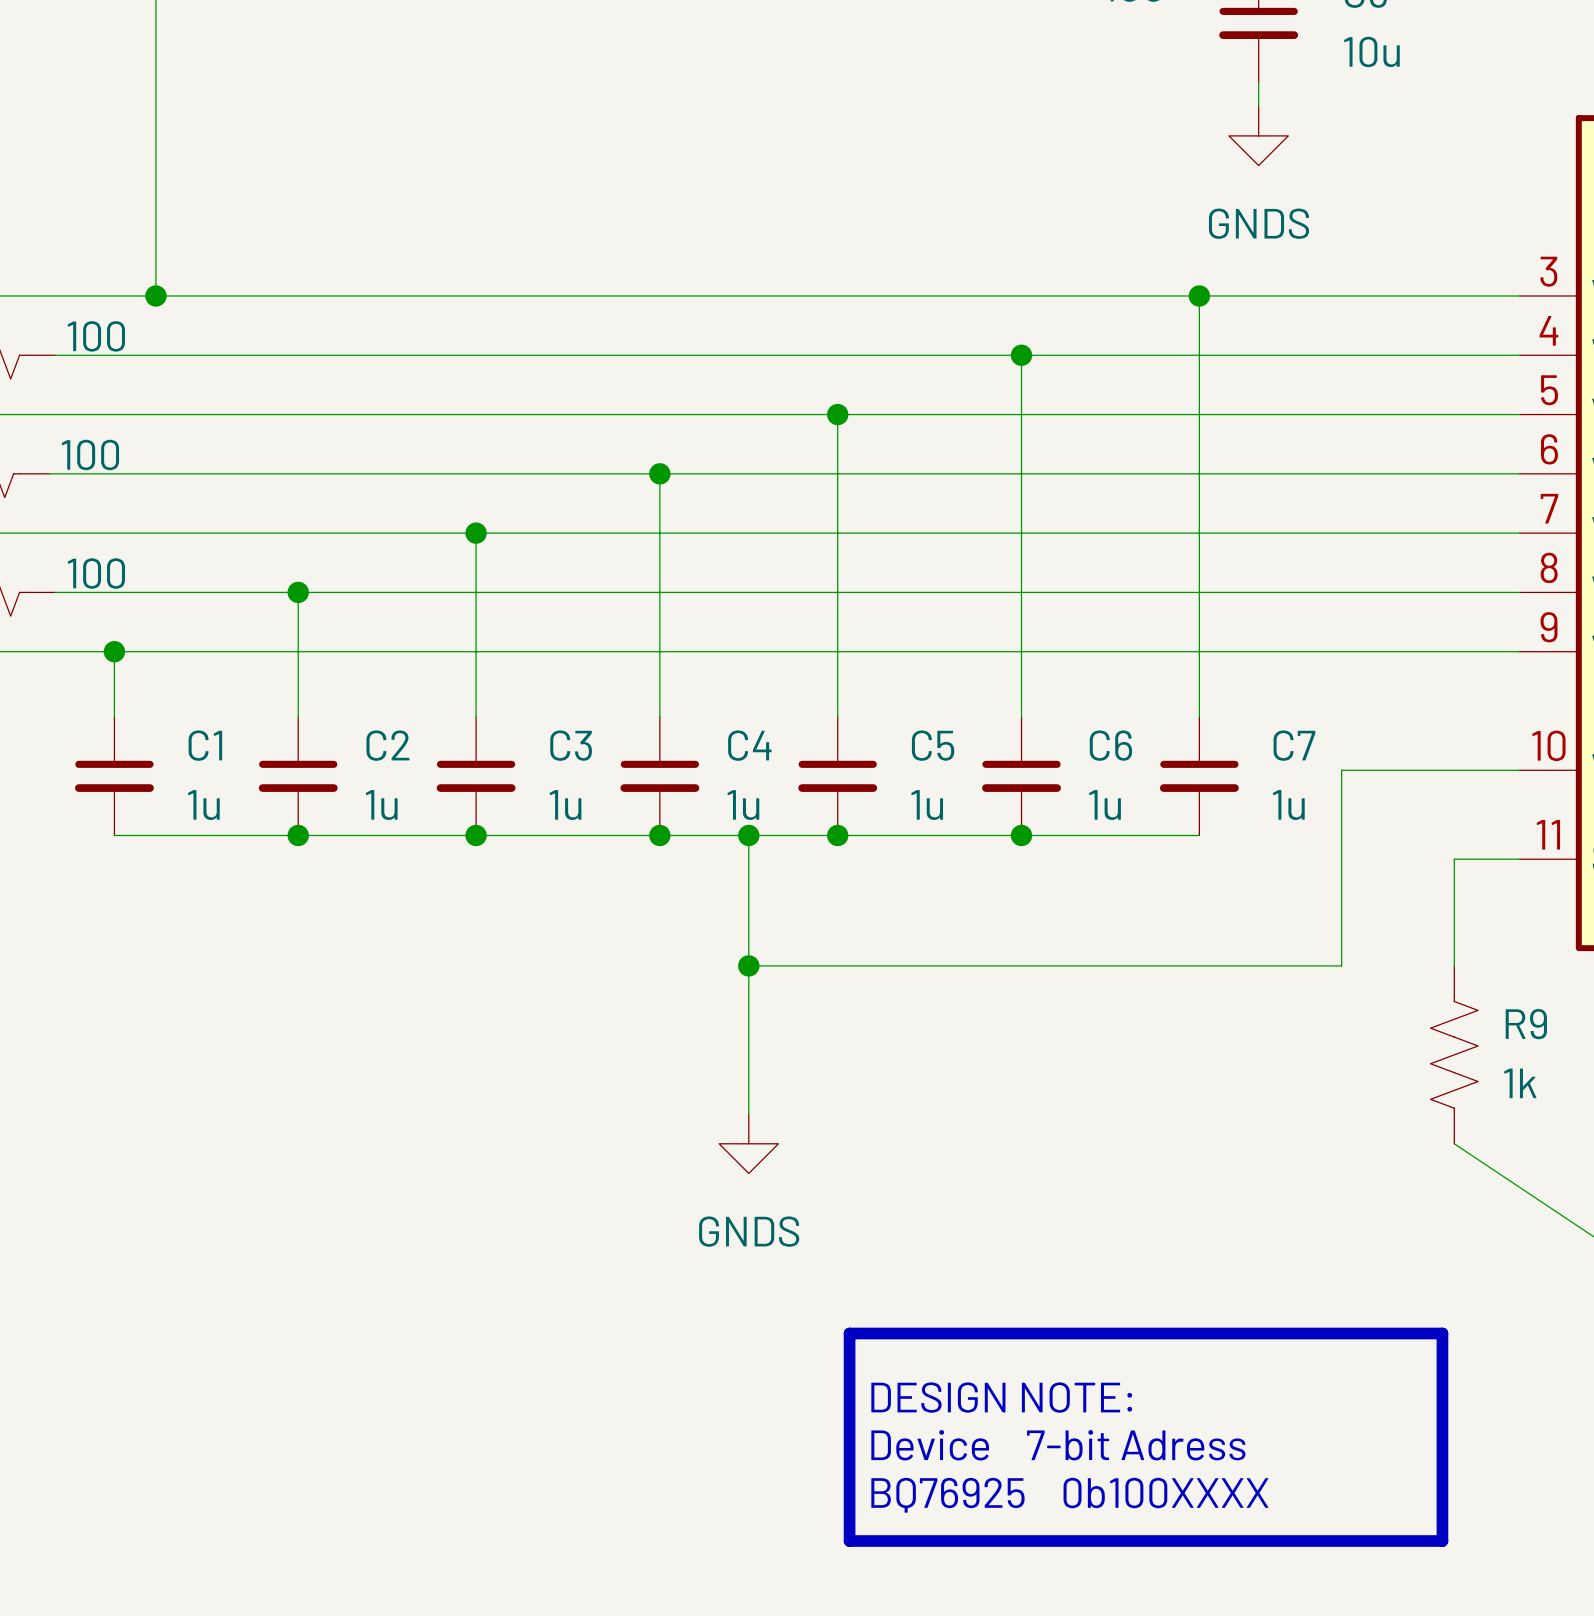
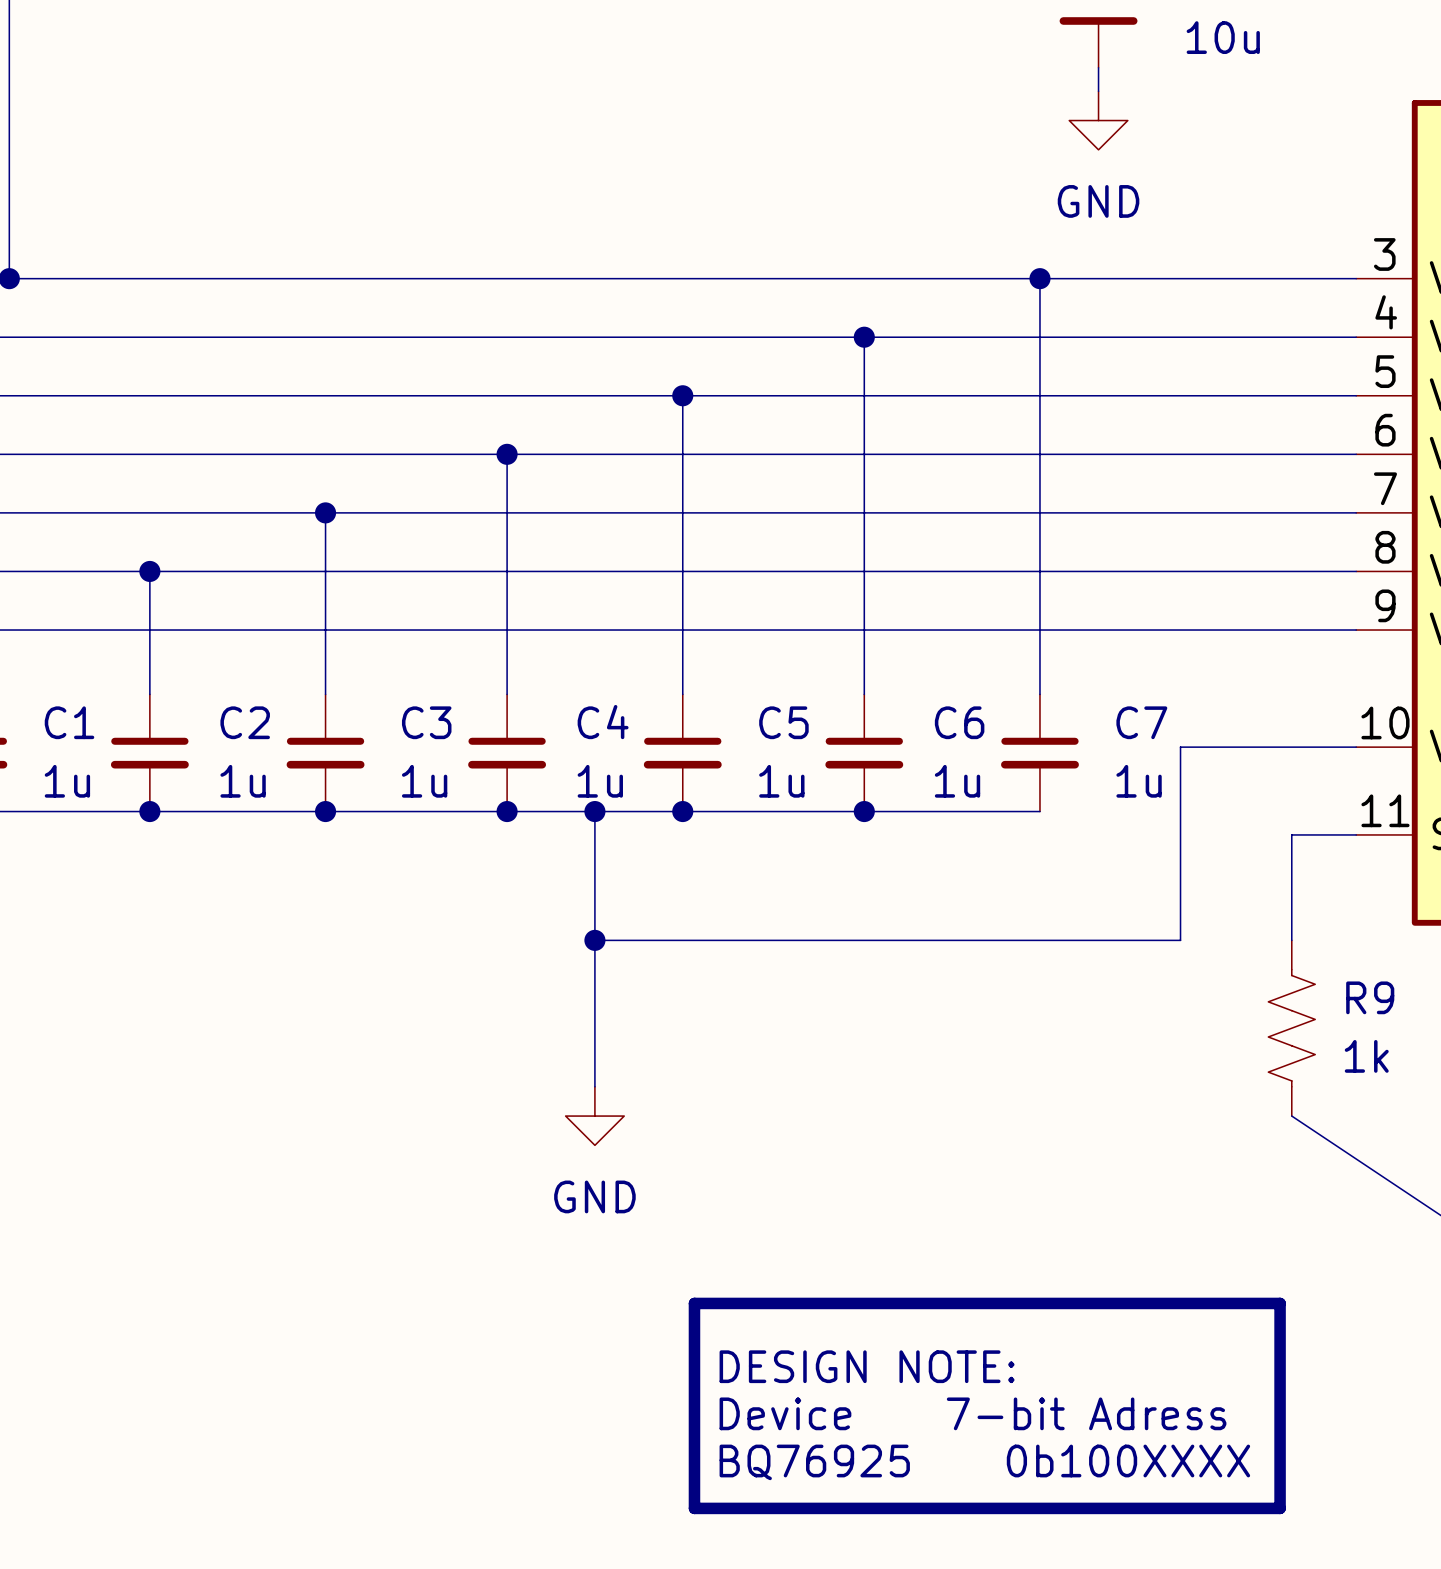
power symbol: GNDS (1258, 135) -> GND (1098, 120)
power symbol: GNDS (748, 1143) -> GND (594, 1116)

